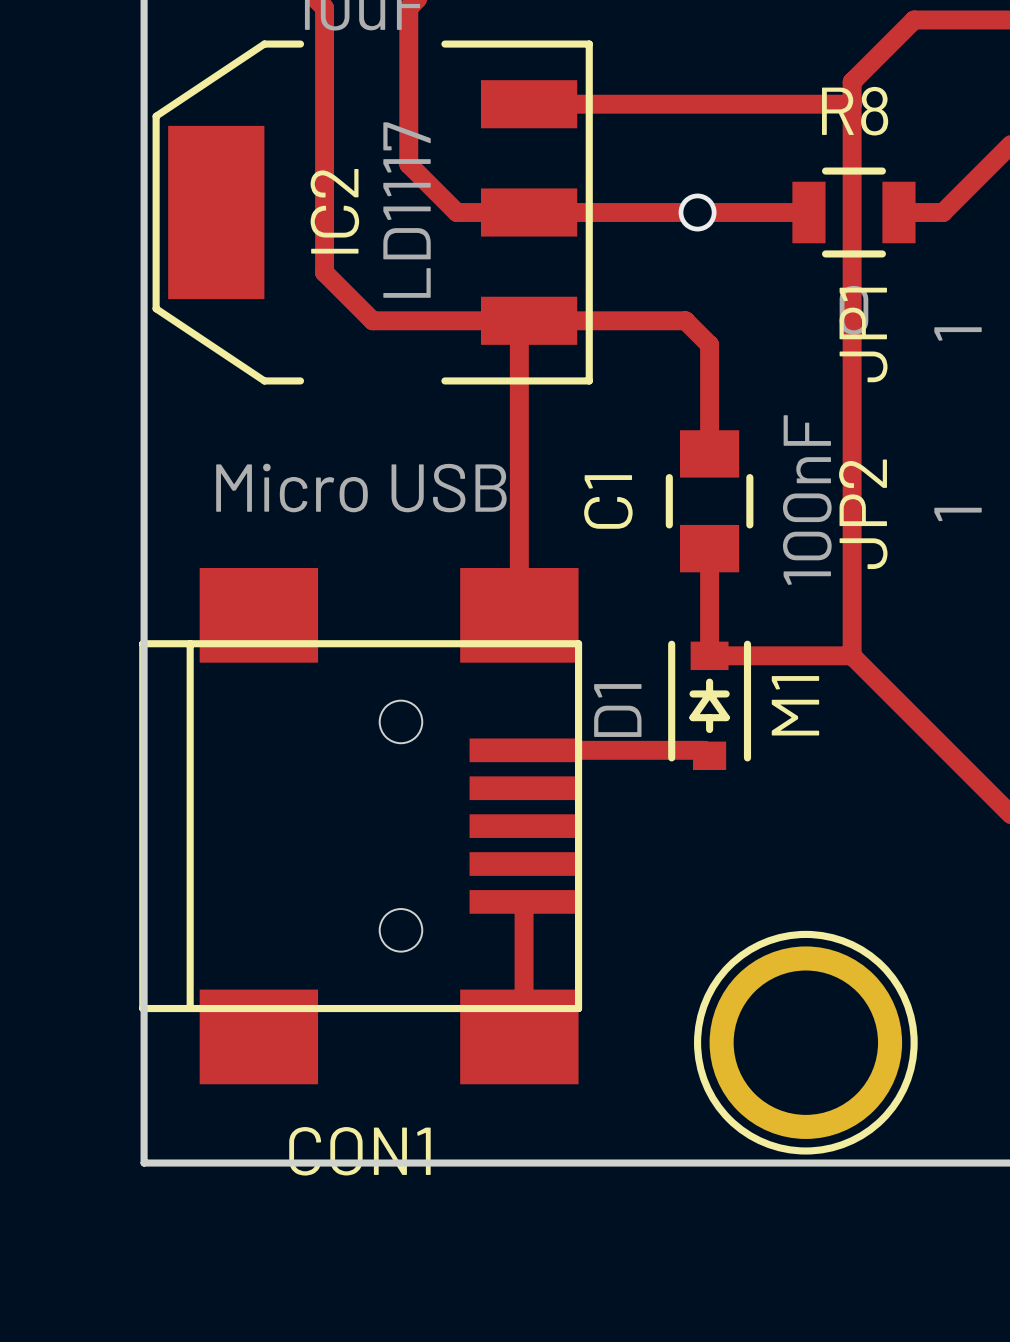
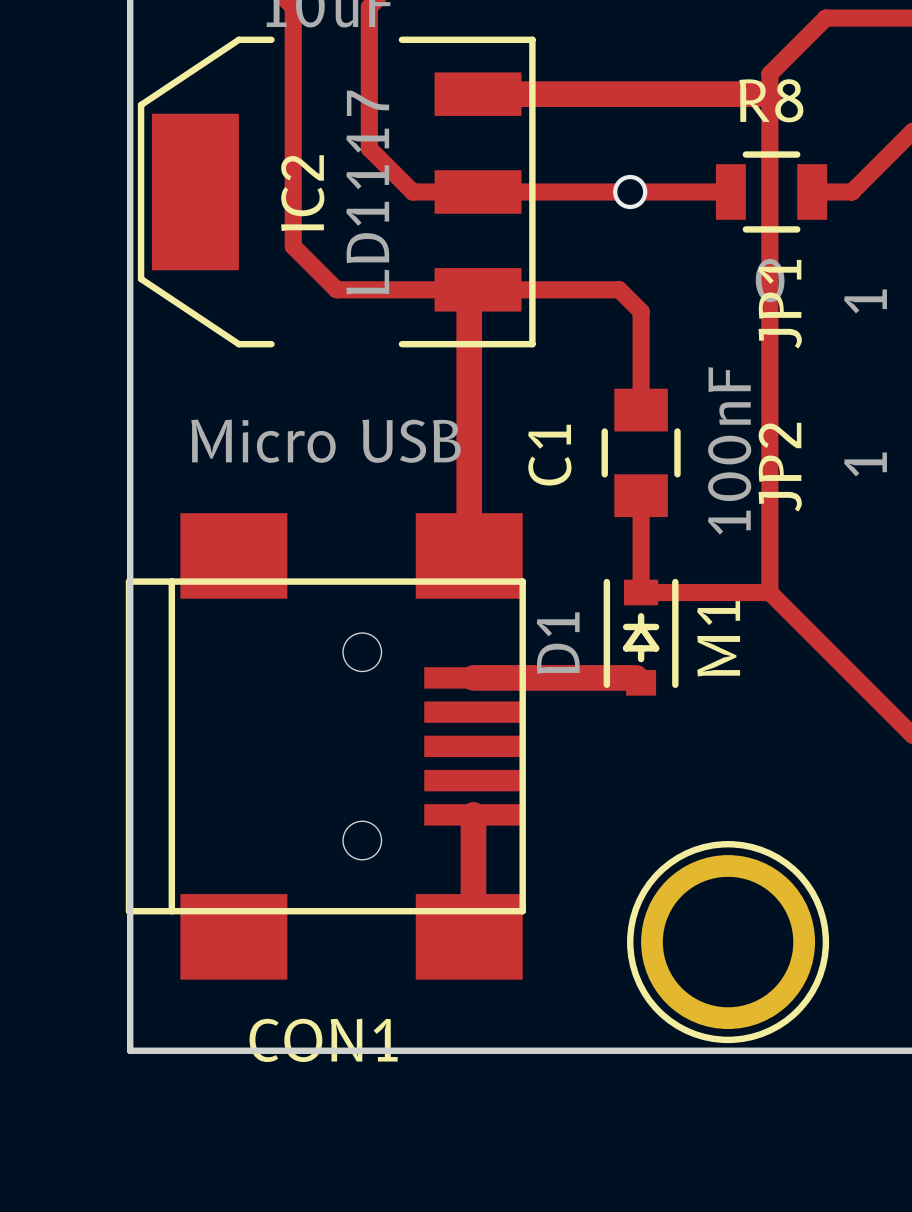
track width: thin (529, 104) (852, 104) -> thick (478, 94) (769, 94)
track width: thin (529, 320) (519, 330) (519, 615) -> thick (478, 289) (469, 298) (469, 555)
track width: thin (524, 750) (704, 750) -> thick (473, 677) (636, 677)
track width: thin (524, 901) (524, 1032) (519, 1036) -> thick (473, 814) (473, 932) (469, 936)

